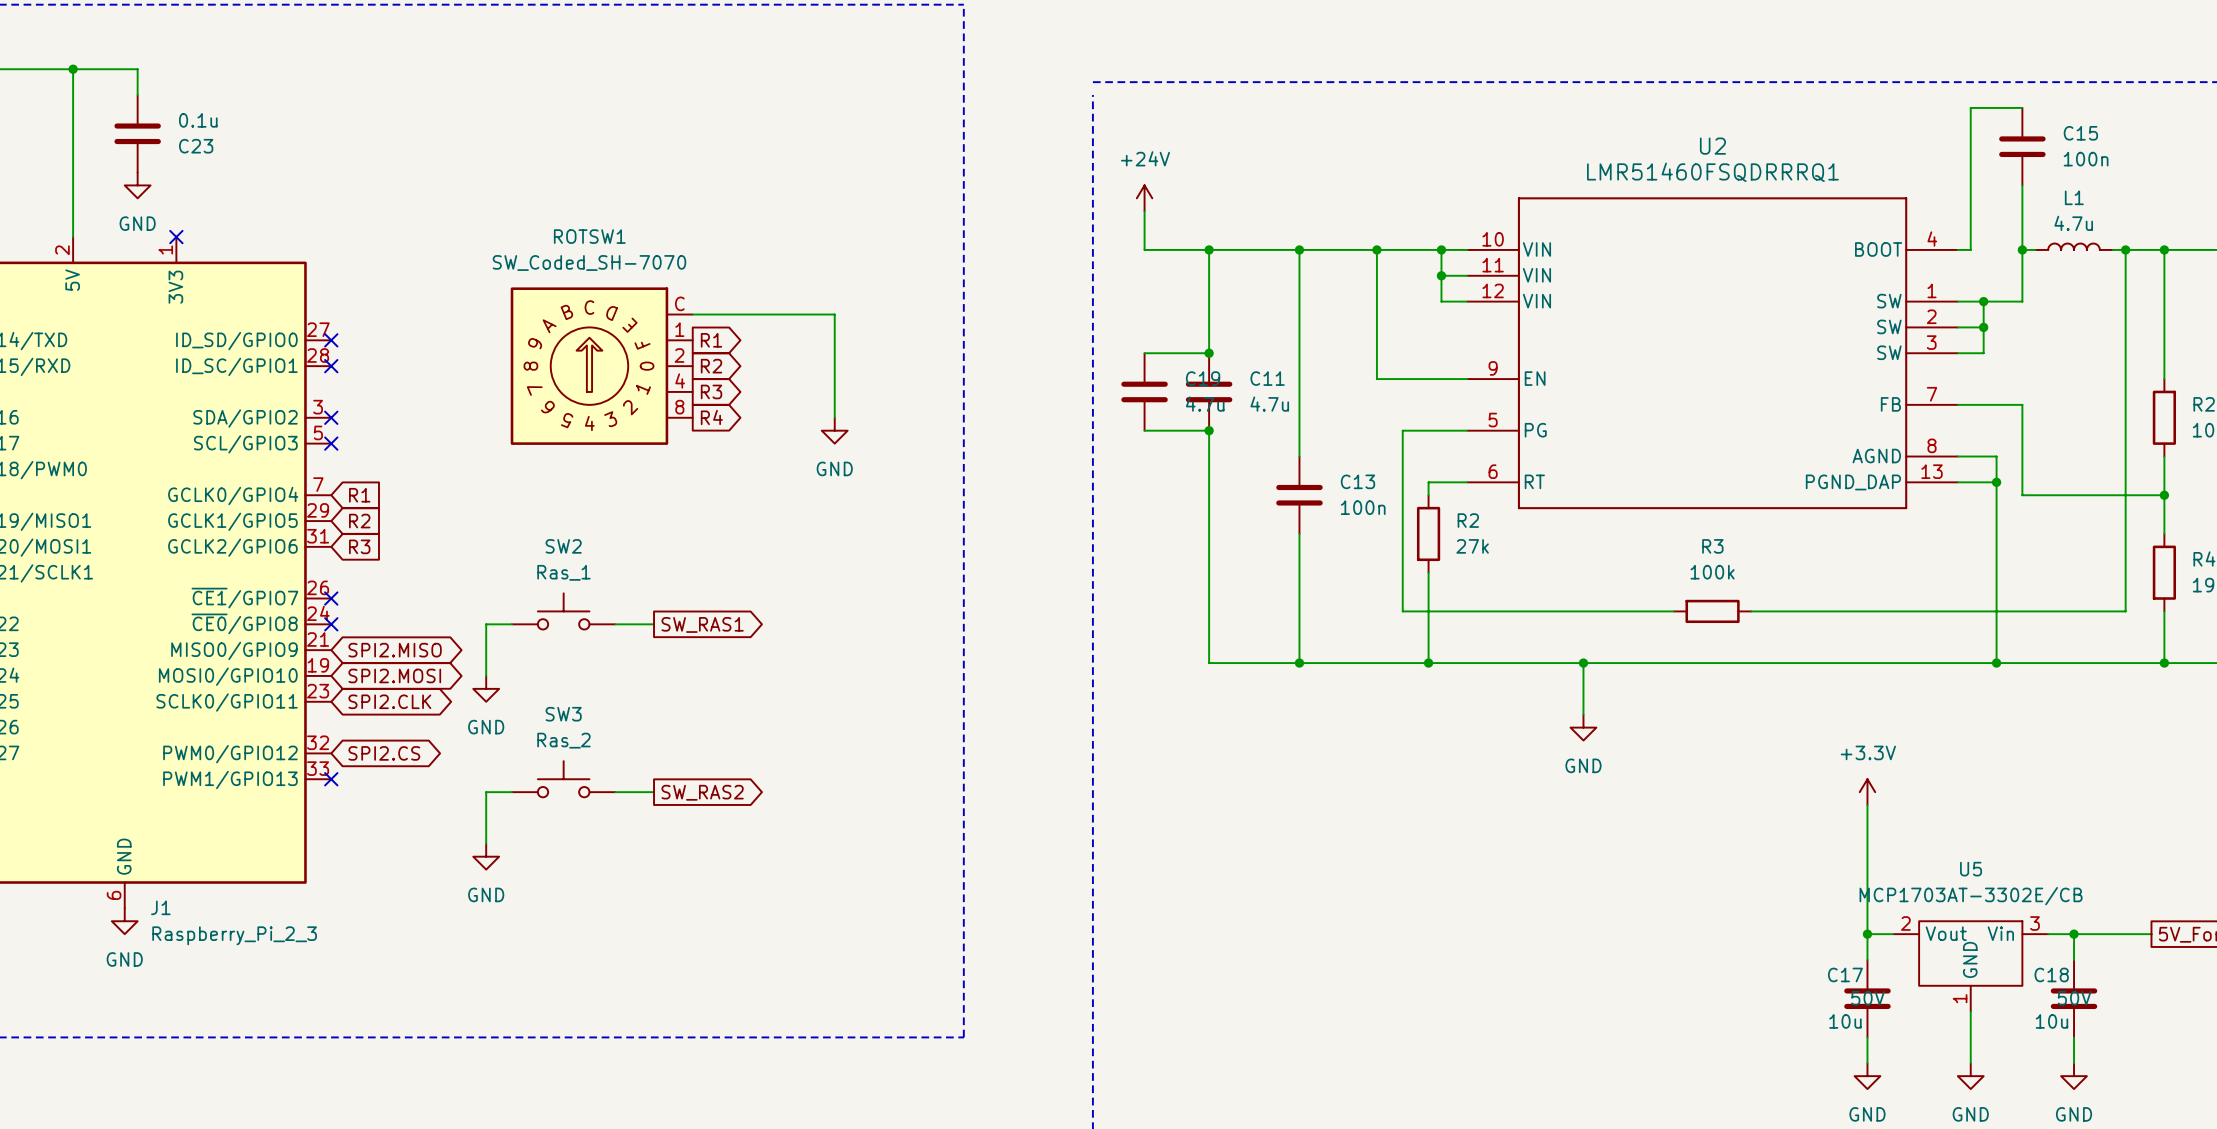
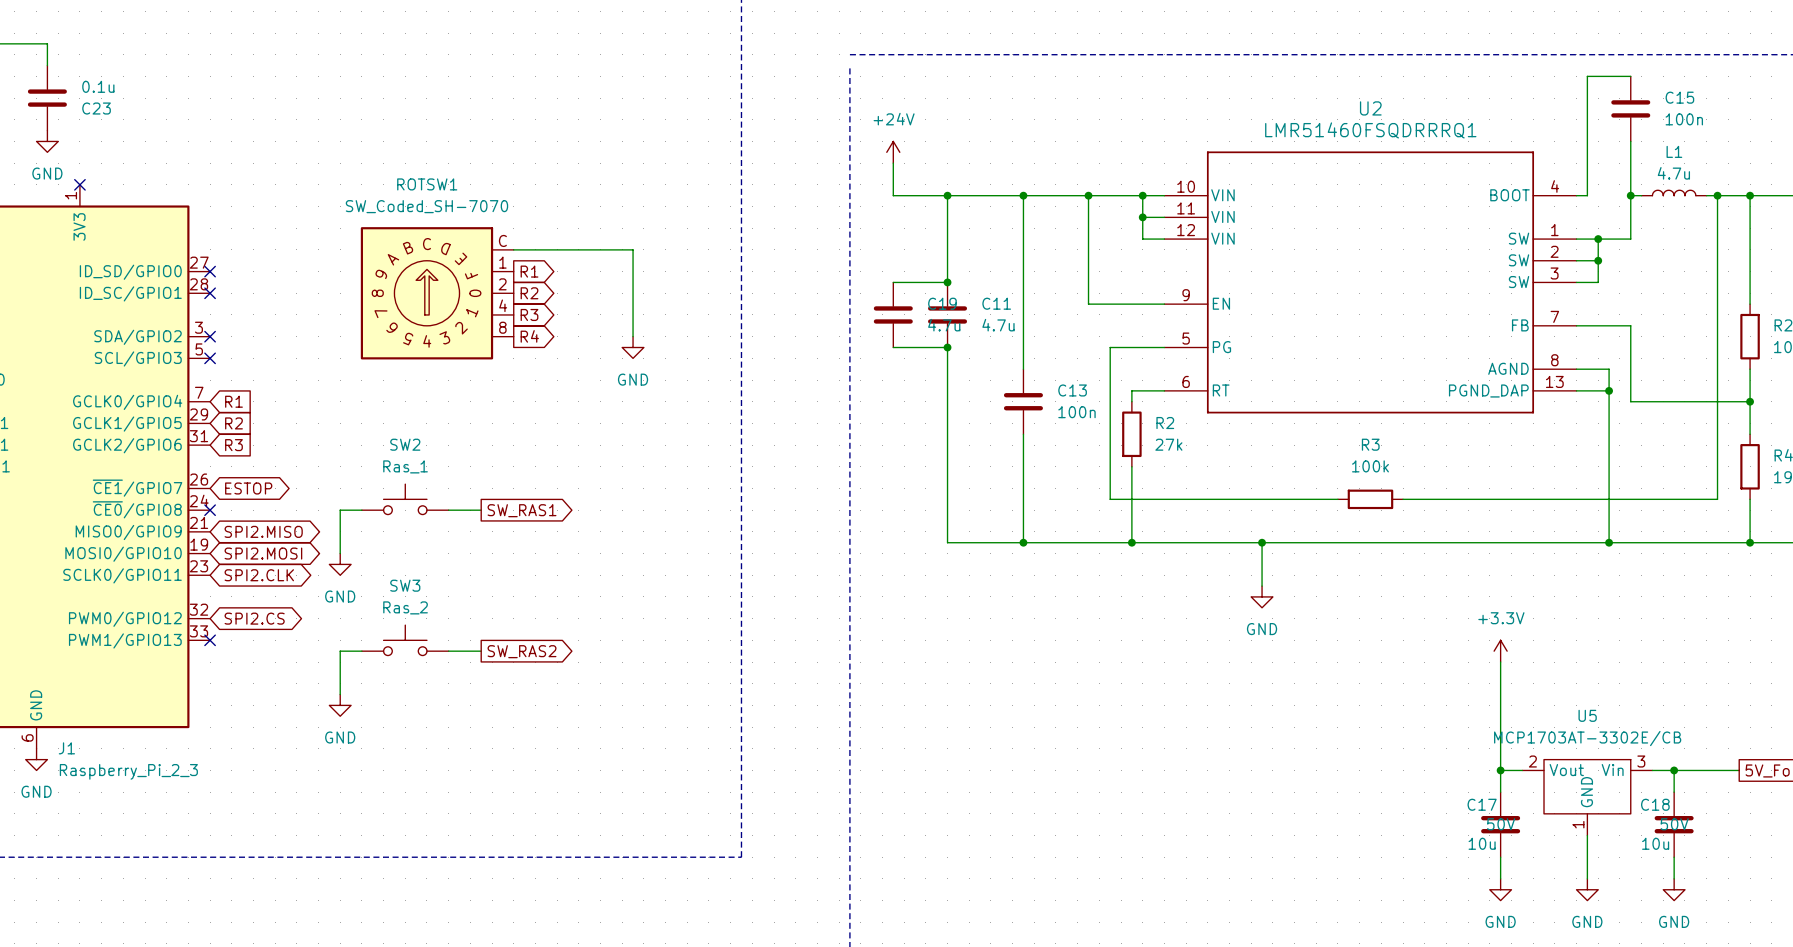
no-connect mark: (331, 598) -> none
global label: none -> ESTOP (248, 488)

